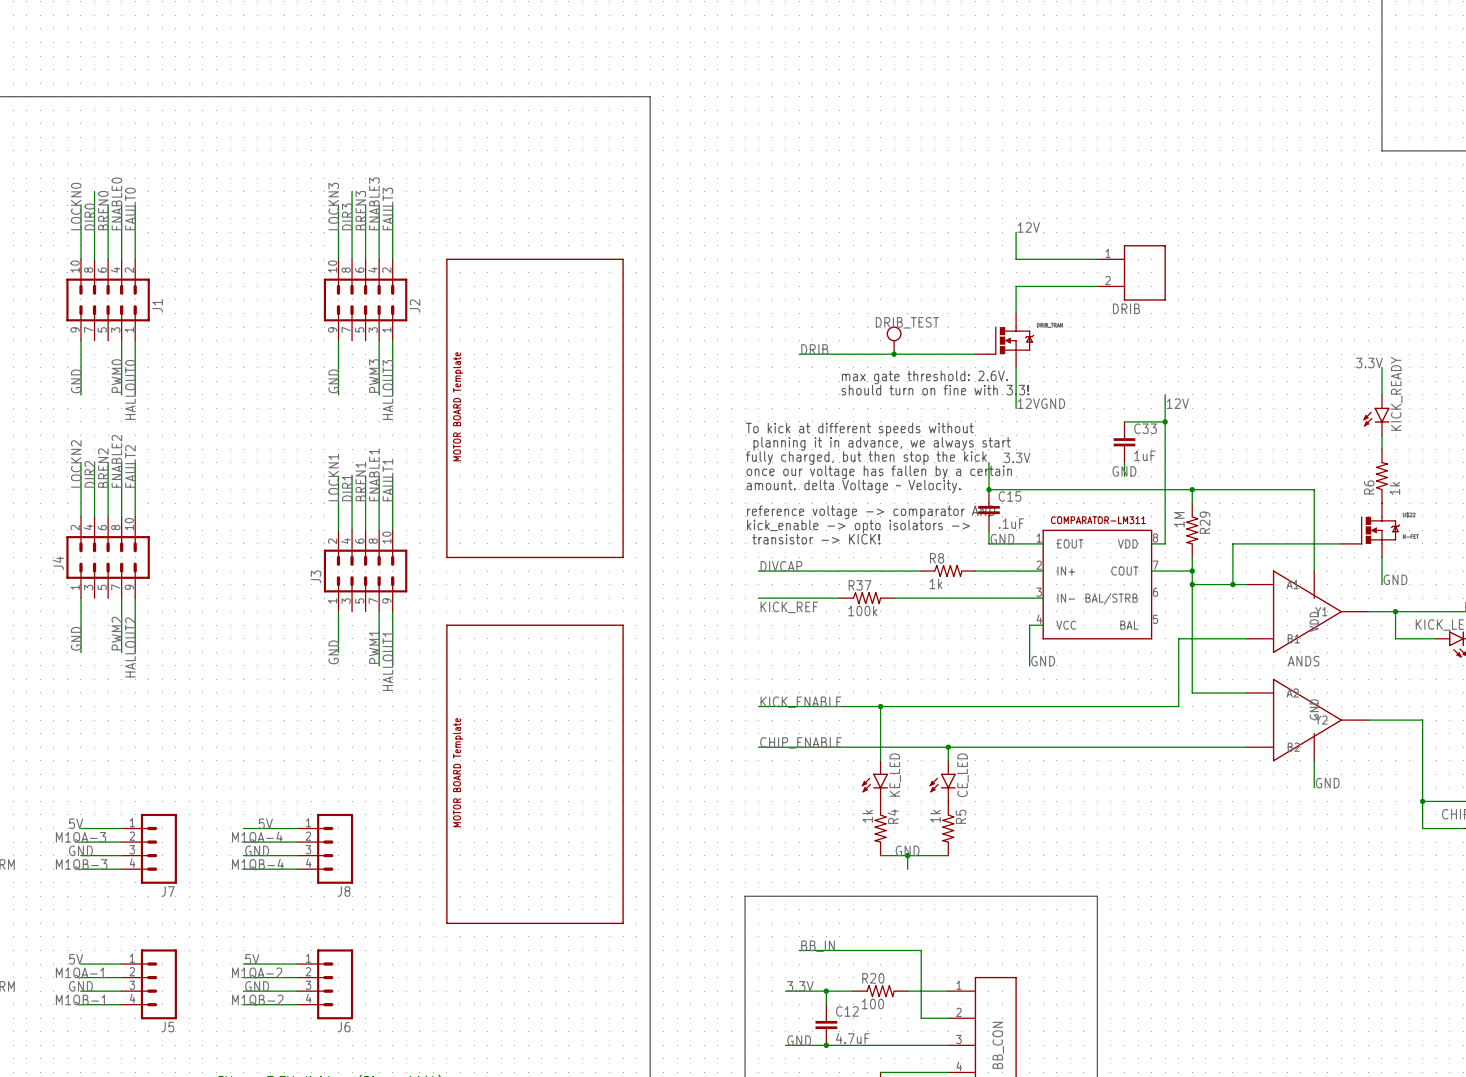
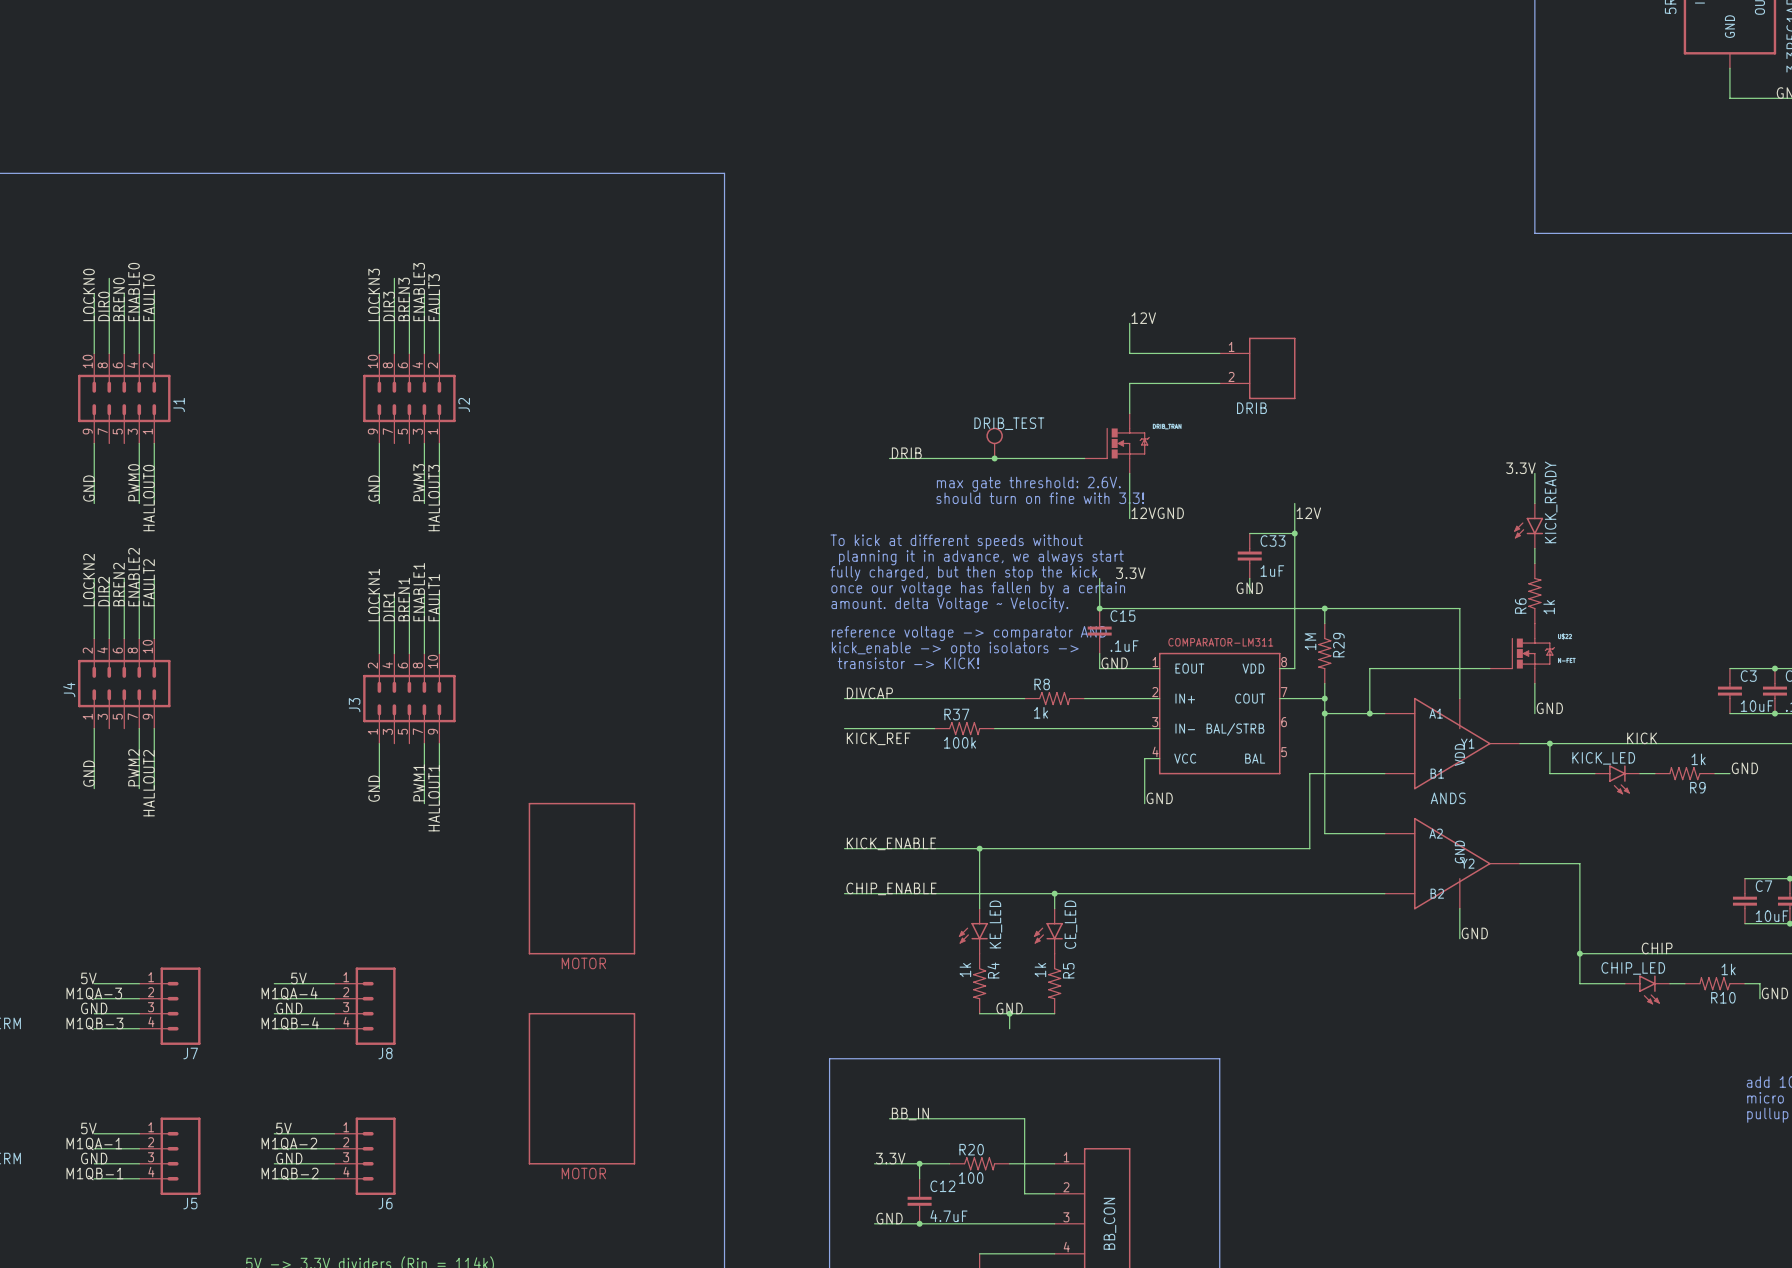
part: (534, 408) -> none
part: none -> (581, 878)
part: (534, 774) -> none
part: none -> (581, 1088)

